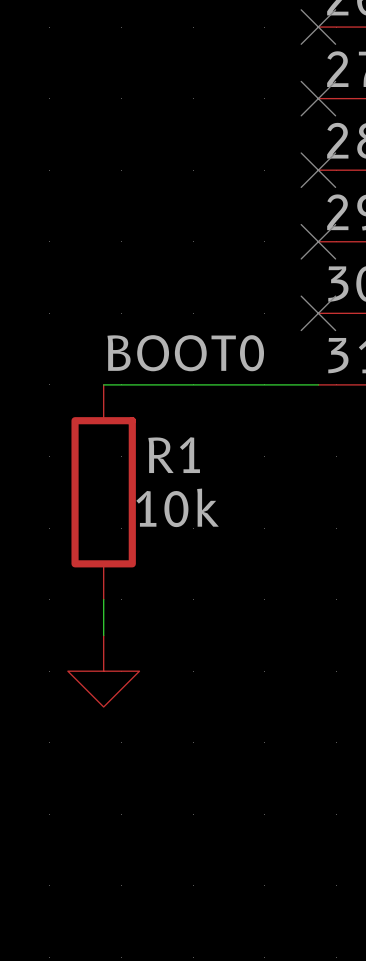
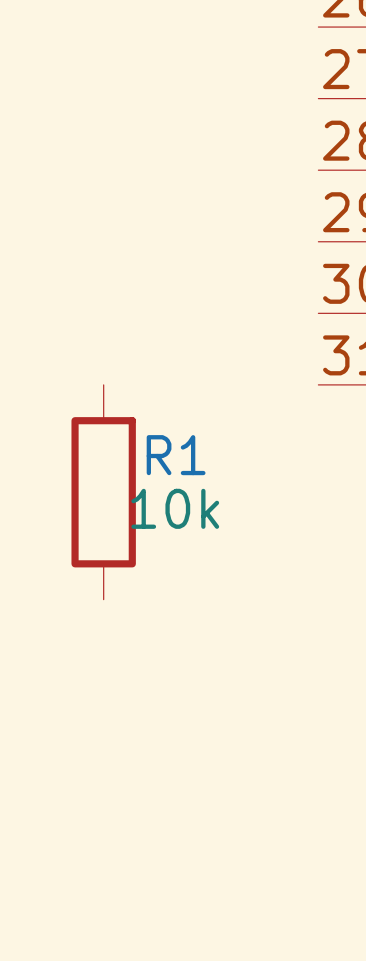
no-connect mark: (318, 27) -> none
no-connect mark: (318, 98) -> none
no-connect mark: (318, 170) -> none
no-connect mark: (318, 241) -> none
no-connect mark: (318, 313) -> none
label: BOOT0 (185, 353) -> none
wire: (103, 384) (318, 384) -> none
wire: (103, 599) (103, 635) -> none
power symbol: (103, 671) -> none

